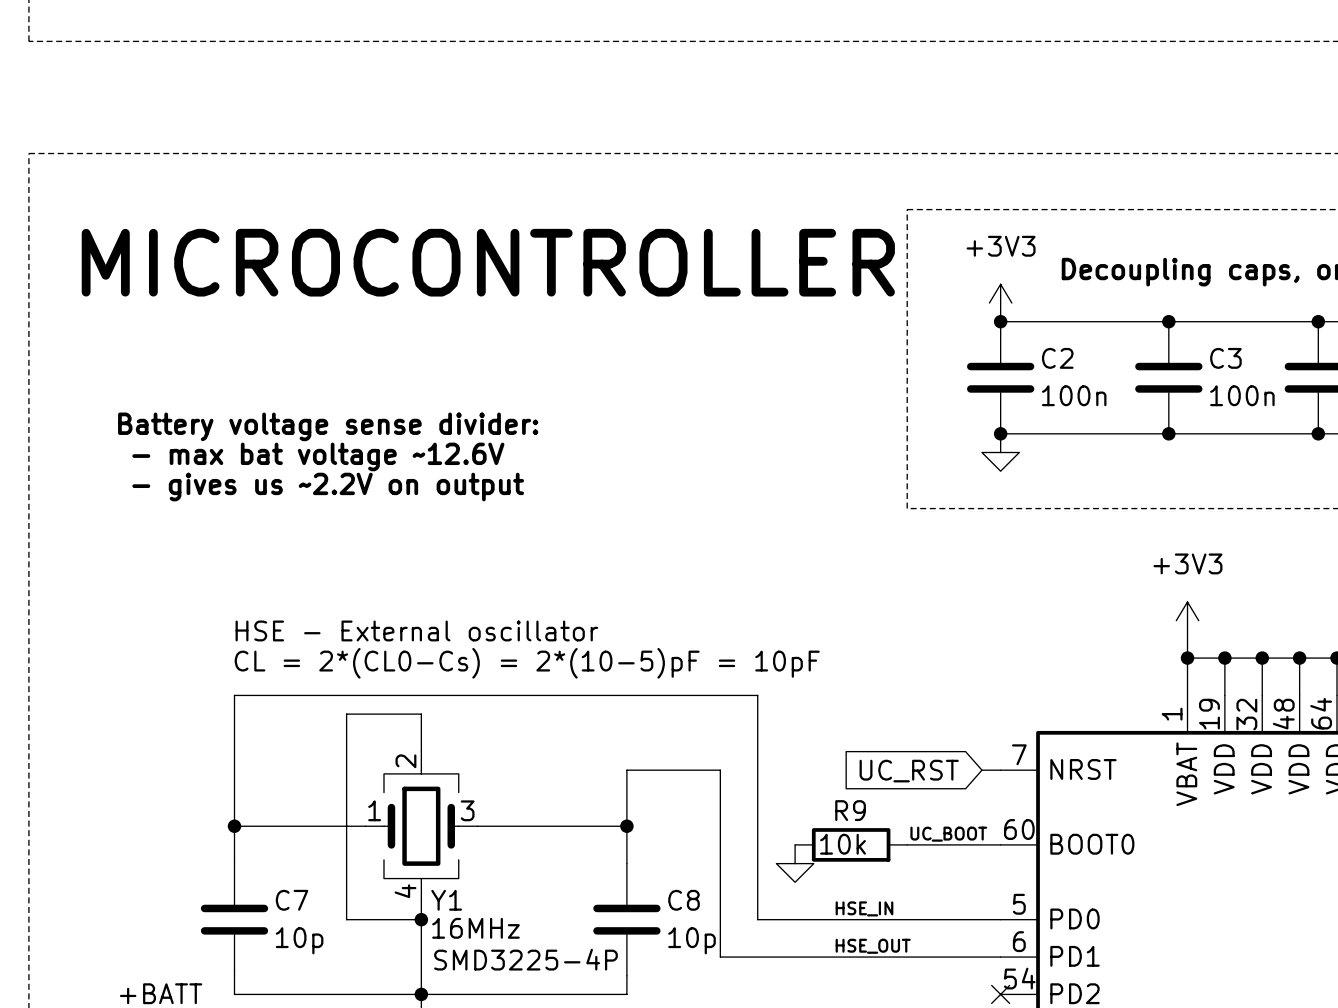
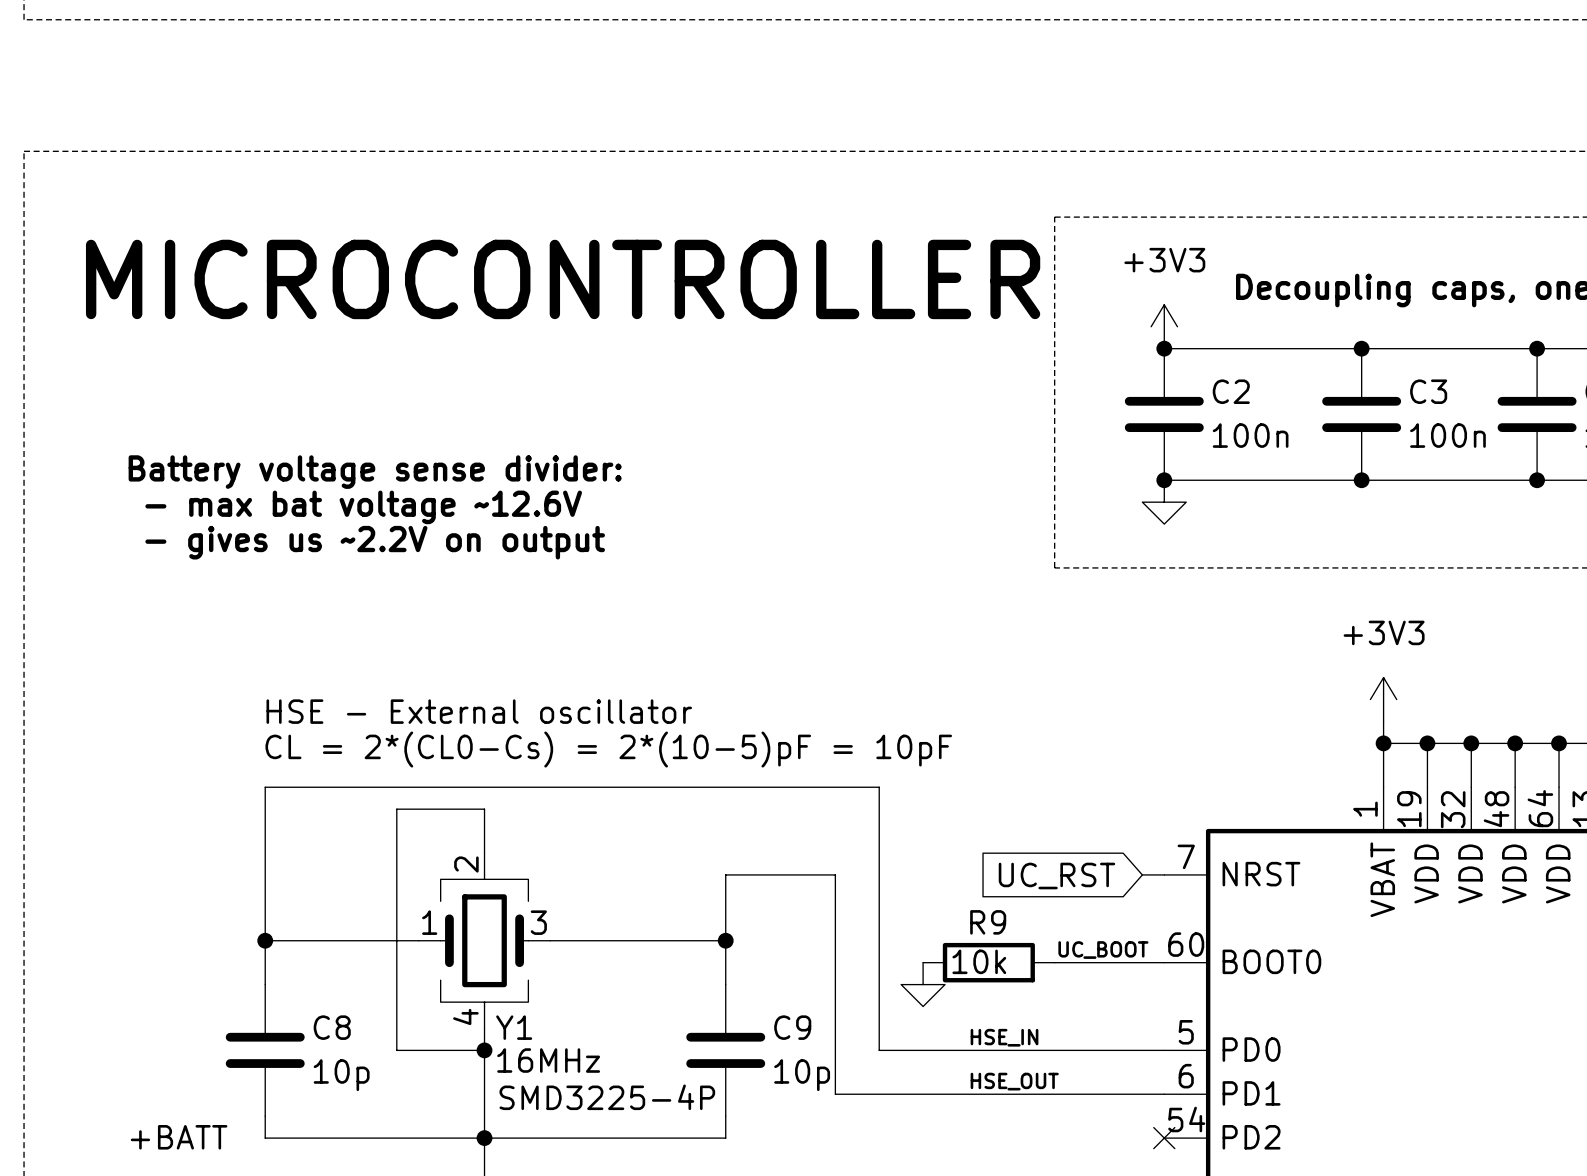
C7 name: C7 (292, 900) -> C8 (332, 1027)
C8 name: C8 (684, 900) -> C9 (792, 1027)

